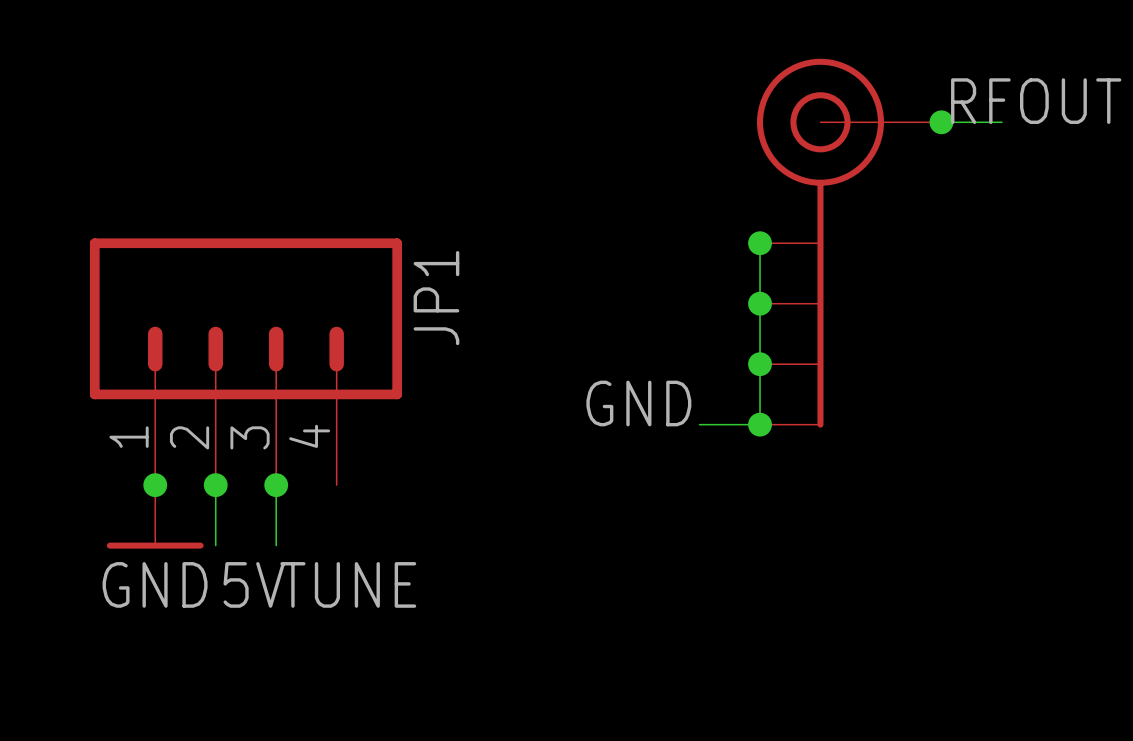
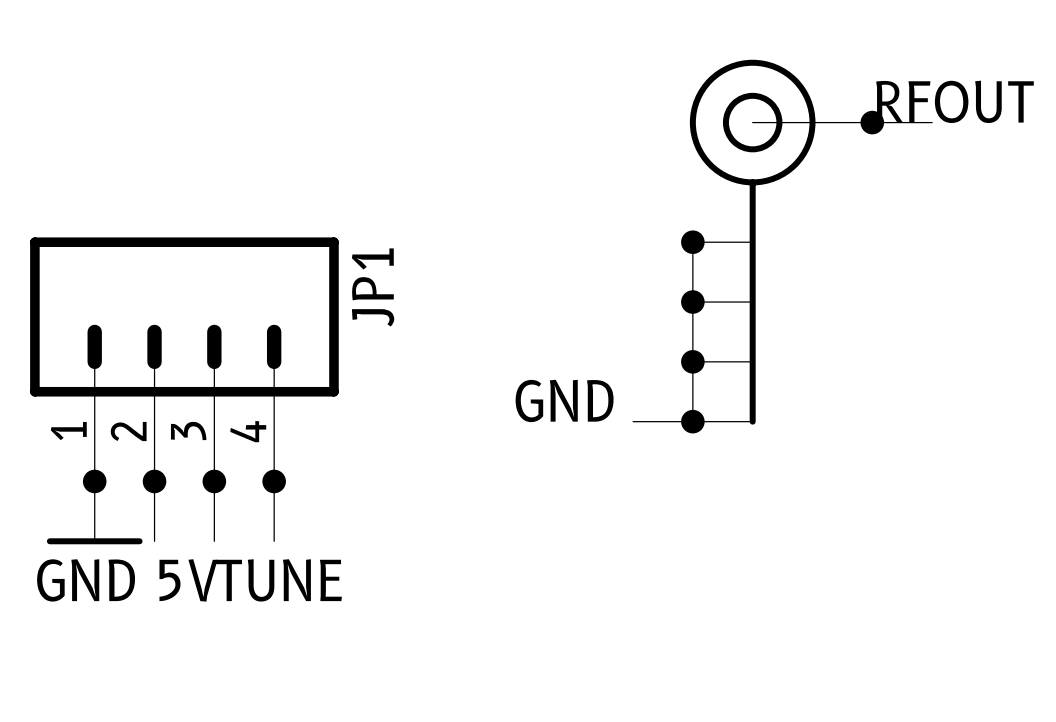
wire: none -> (274, 481) (274, 541)
junction: none -> (274, 481)

